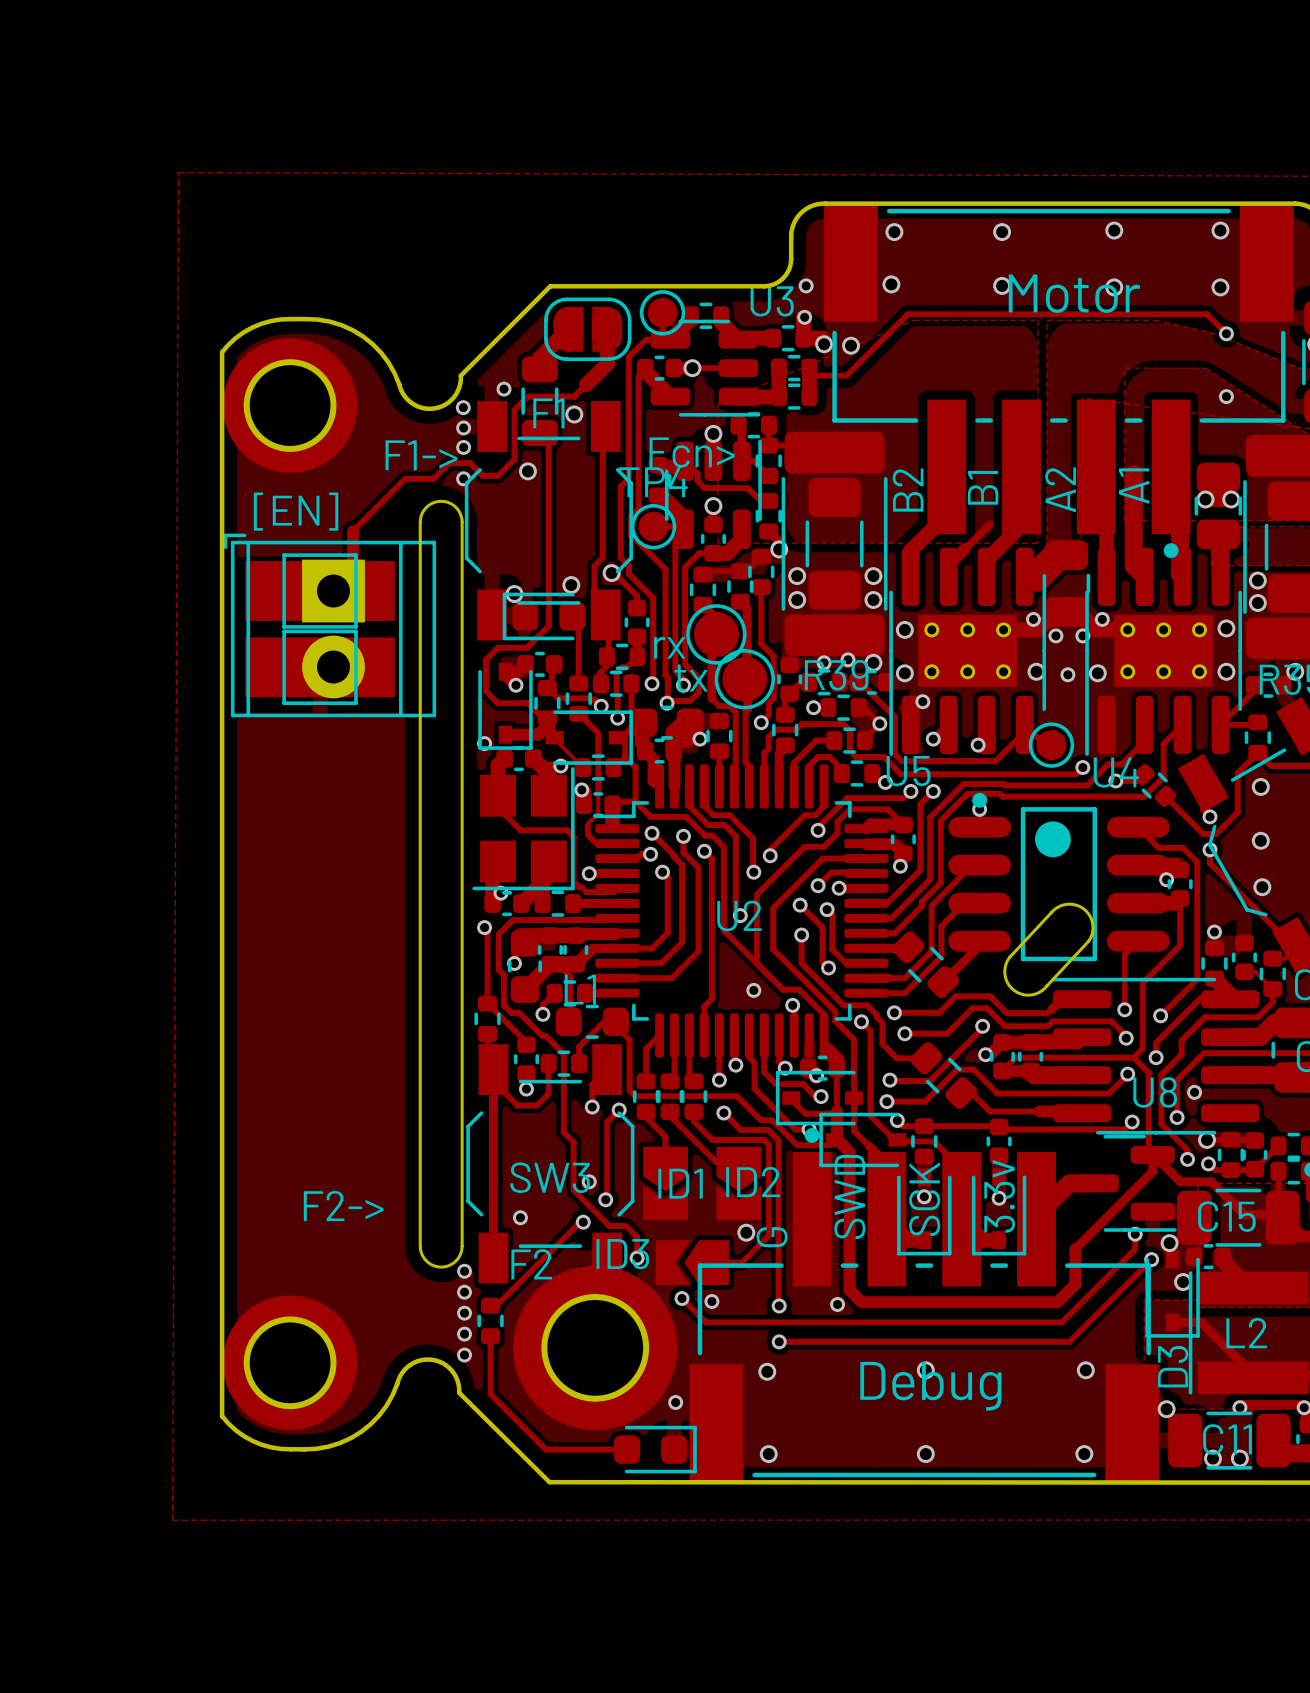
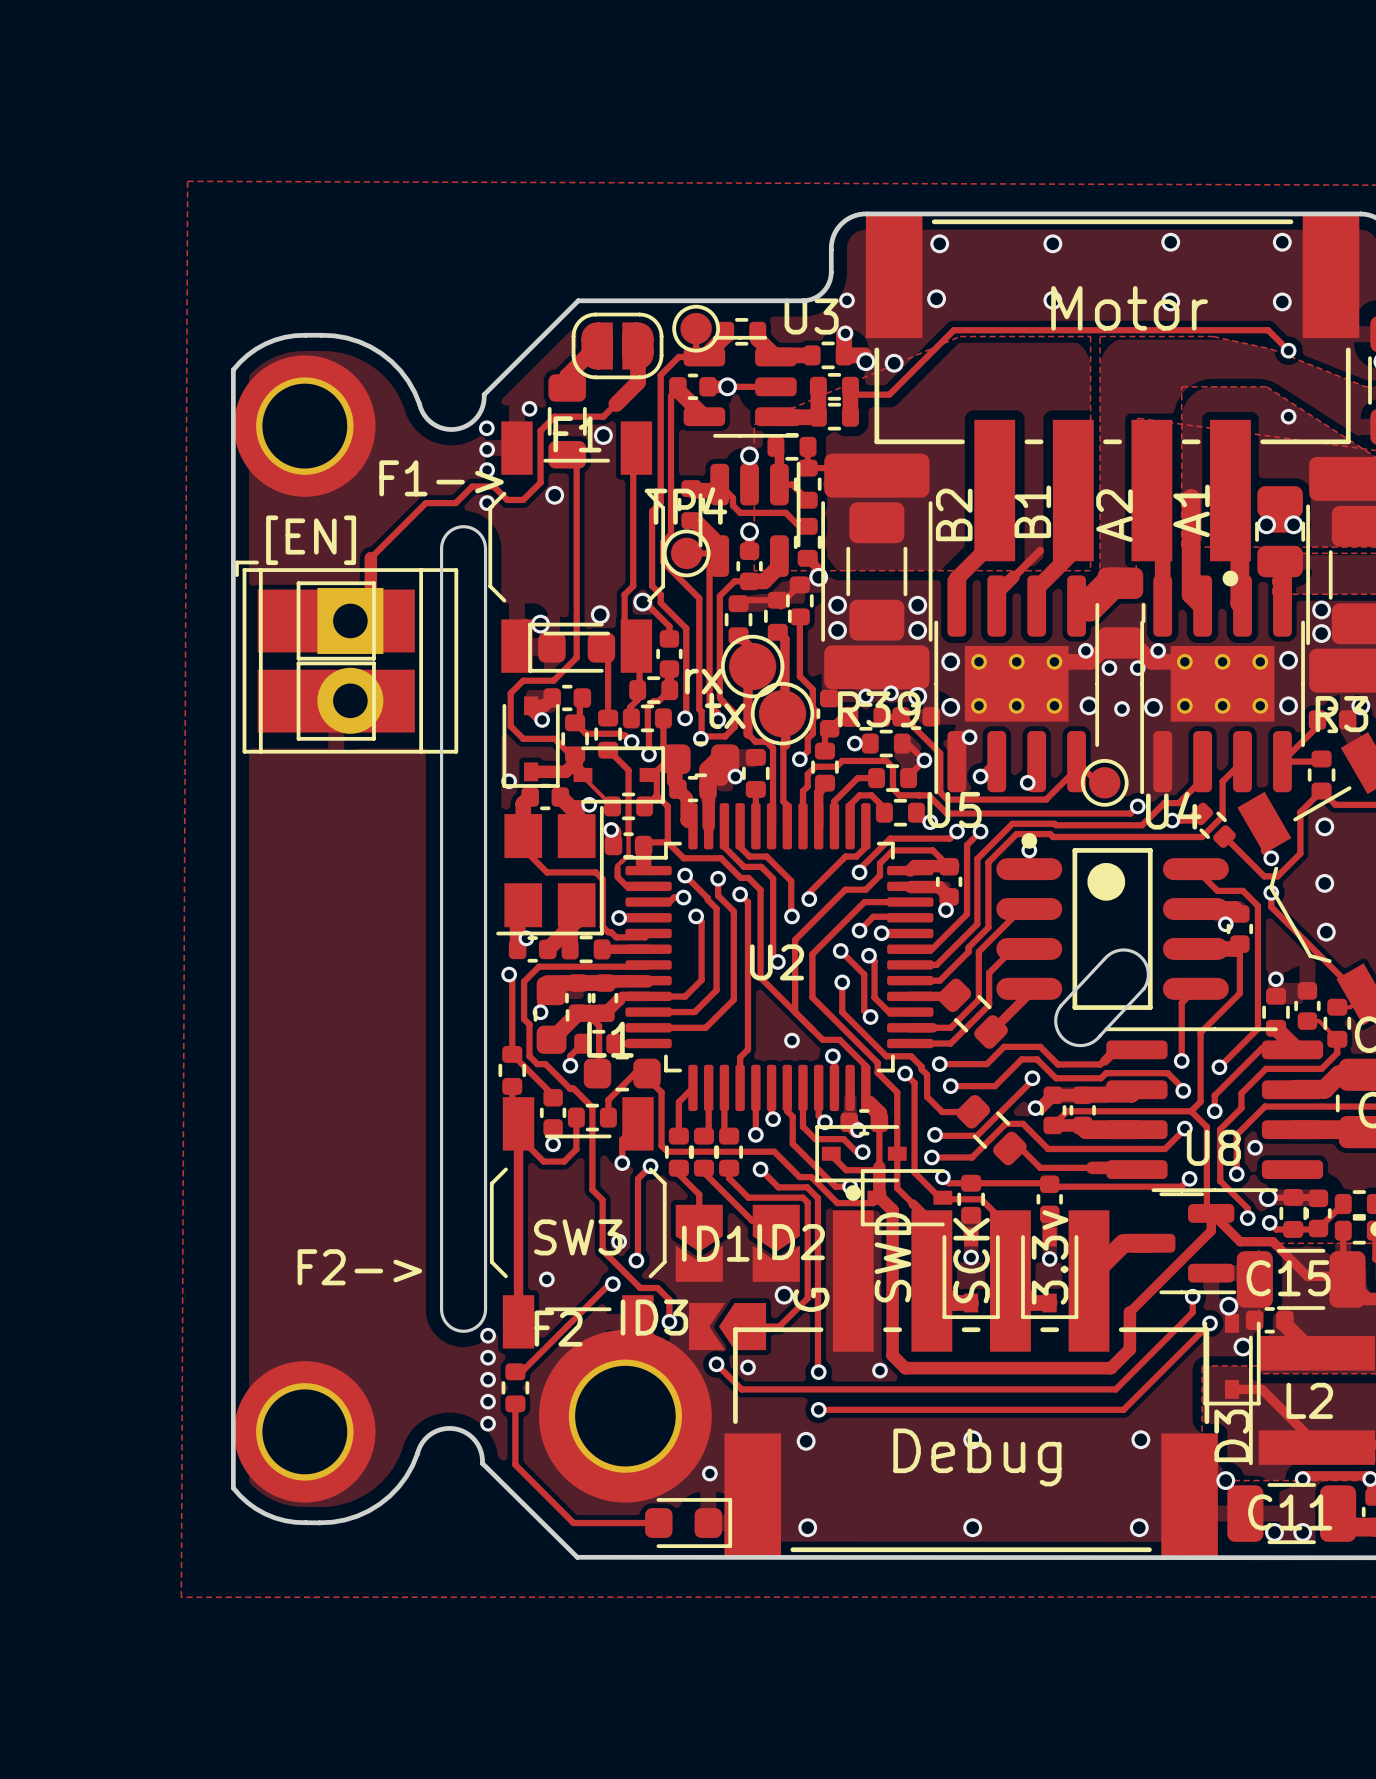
part value: Fcn> (692, 452) -> none

